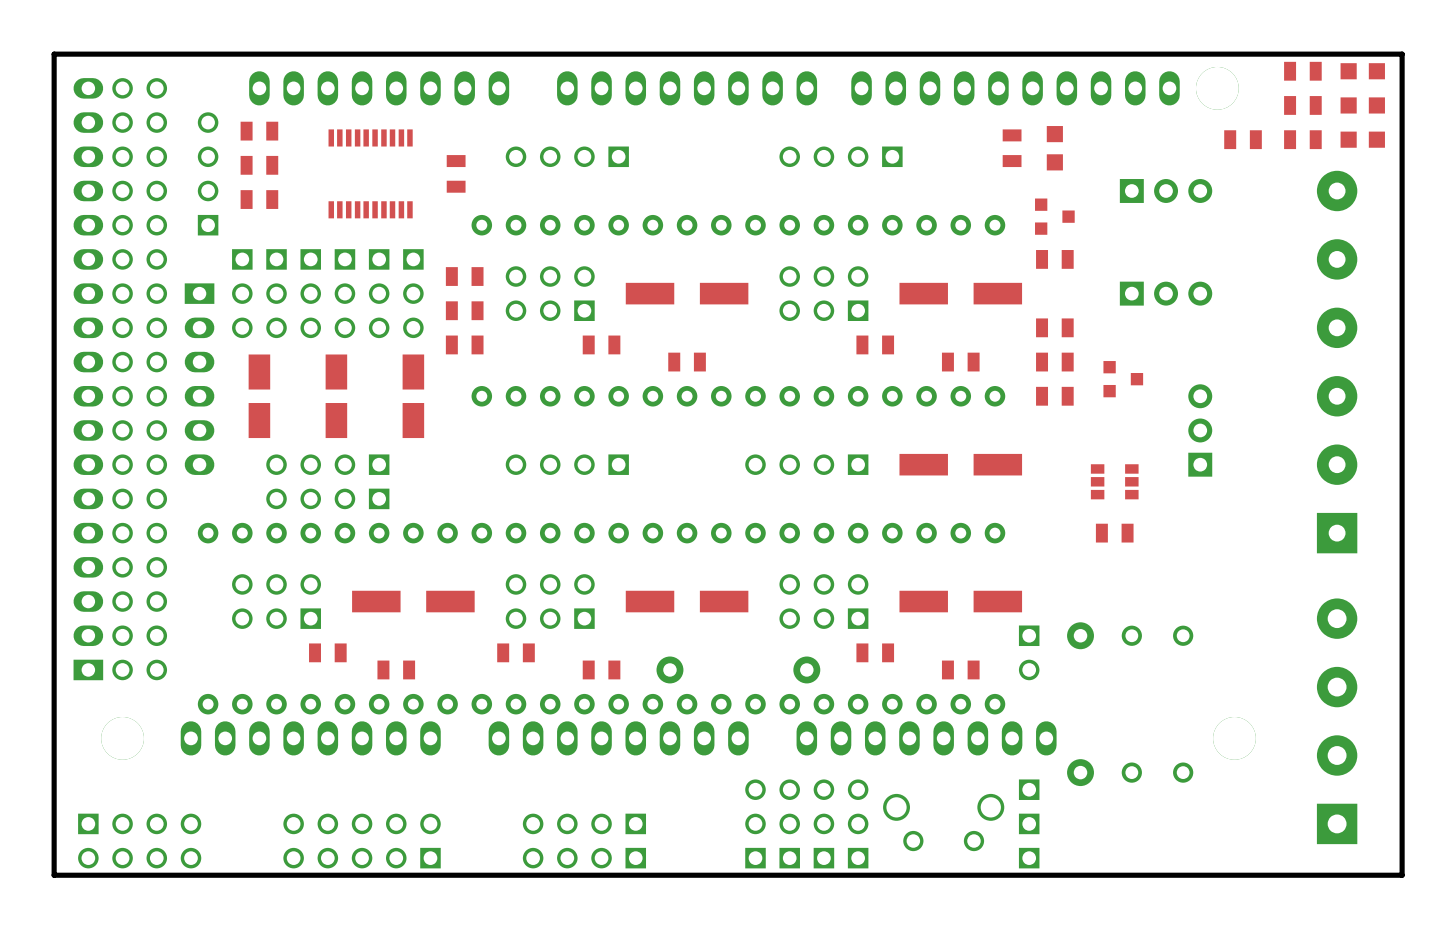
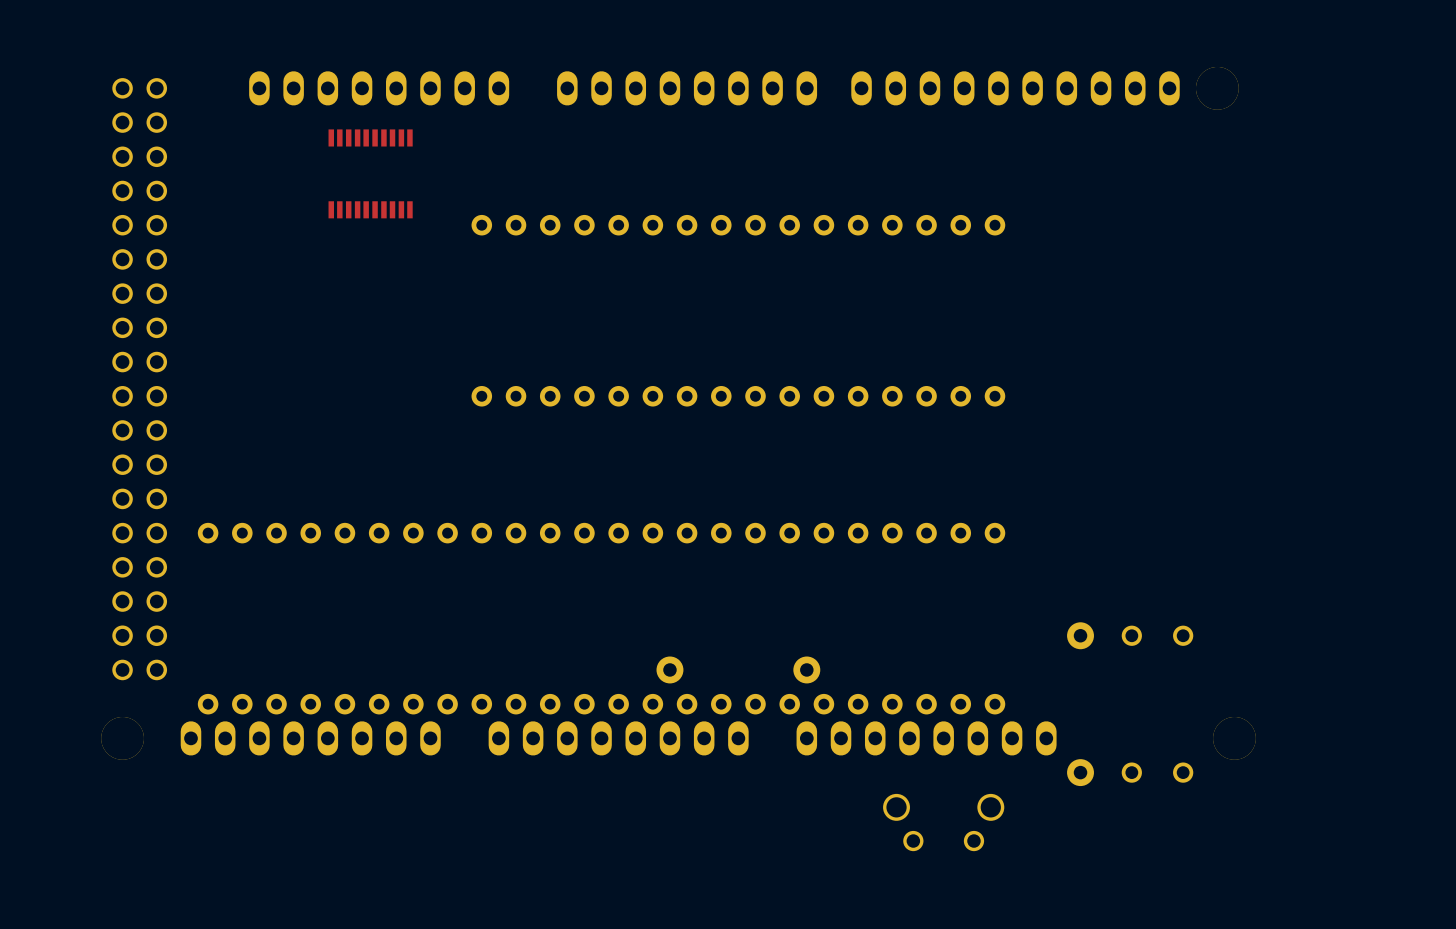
board edge: (1402, 54) (1402, 875) (54, 875) (54, 54) (1402, 54) -> none
part: (1302, 71) -> none
part: (1362, 71) -> none
part: (1302, 105) -> none
part: (1362, 105) -> none
part: (259, 131) -> none
part: (1243, 139) -> none
part: (1302, 139) -> none
part: (1362, 139) -> none
part: (1012, 148) -> none
part: (1054, 148) -> none
part: (567, 156) -> none
part: (841, 156) -> none
part: (259, 165) -> none
part: (208, 173) -> none
part: (456, 173) -> none
part: (1166, 190) -> none
part: (259, 199) -> none
part: (1054, 216) -> none
part: (1054, 259) -> none
part: (464, 276) -> none
part: (242, 293) -> none
part: (276, 293) -> none
part: (310, 293) -> none
part: (344, 293) -> none
part: (379, 293) -> none
part: (413, 293) -> none
part: (550, 293) -> none
part: (687, 293) -> none
part: (823, 293) -> none
part: (960, 293) -> none
part: (1166, 293) -> none
part: (464, 310) -> none
part: (1054, 327) -> none
part: (464, 344) -> none
part: (601, 344) -> none
part: (875, 344) -> none
part: (687, 362) -> none
part: (960, 362) -> none
part: (1054, 362) -> none
part: (1337, 362) -> none
part: (88, 379) -> none
part: (199, 379) -> none
part: (1123, 379) -> none
part: (259, 396) -> none
part: (336, 396) -> none
part: (413, 396) -> none
part: (1054, 396) -> none
part: (1200, 430) -> none
part: (327, 464) -> none
part: (567, 464) -> none
part: (806, 464) -> none
part: (960, 464) -> none
part: (1114, 481) -> none
part: (327, 498) -> none
part: (1114, 533) -> none
part: (276, 601) -> none
part: (413, 601) -> none
part: (550, 601) -> none
part: (687, 601) -> none
part: (823, 601) -> none
part: (960, 601) -> none
part: (327, 652) -> none
part: (516, 652) -> none
part: (875, 652) -> none
part: (1029, 652) -> none
part: (396, 669) -> none
part: (601, 669) -> none
part: (960, 669) -> none
part: (1337, 721) -> none
part: (1029, 789) -> none
part: (584, 823) -> none
part: (755, 823) -> none
part: (789, 823) -> none
part: (823, 823) -> none
part: (858, 823) -> none
part: (1029, 823) -> none
part: (139, 841) -> none
part: (362, 841) -> none
part: (584, 858) -> none
part: (1029, 858) -> none

